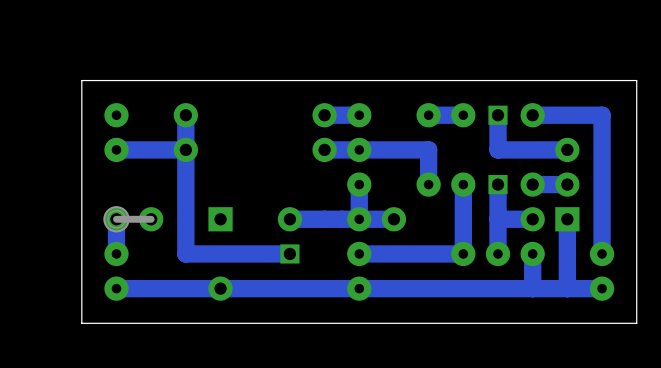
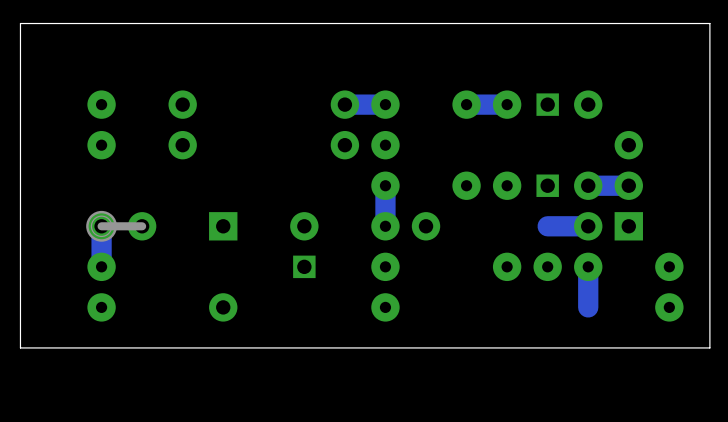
board edge: (636, 80) (81, 80) (81, 323) -> (709, 64) (709, 23) (20, 23) (20, 347) (61, 347)
track: (185, 115) (185, 253) (289, 253) -> none
track: (498, 115) (498, 149) (567, 149) -> none
track: (532, 115) (602, 115) (602, 253) -> none
track: (185, 149) (116, 149) -> none
track: (324, 149) (428, 149) (428, 184) -> none
track: (463, 184) (463, 253) (359, 253) -> none
track: (498, 184) (498, 253) -> none
track: (393, 219) (289, 219) -> none
track: (567, 219) (567, 288) -> none
track: (602, 288) (116, 288) -> none

